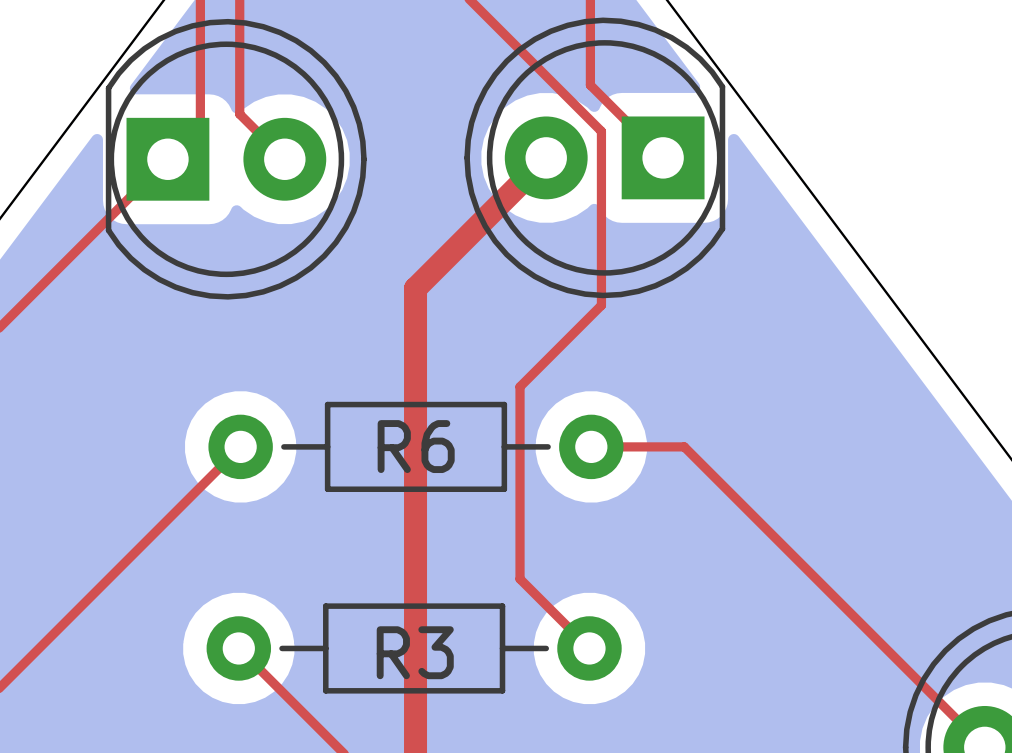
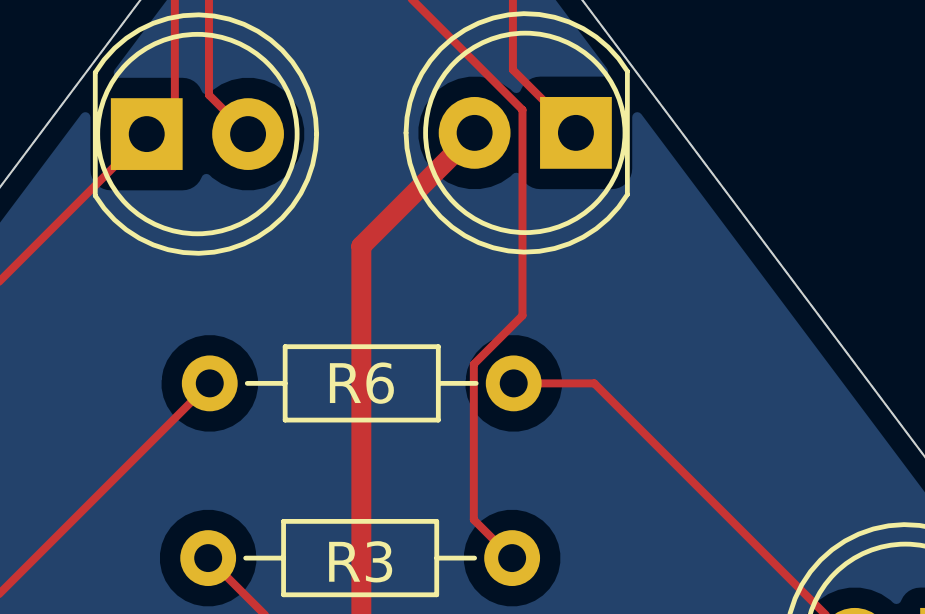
top track: (601, 305) (520, 386) (520, 579) (545, 604) -> (522, 260) (522, 315) (473, 364) (473, 519)

